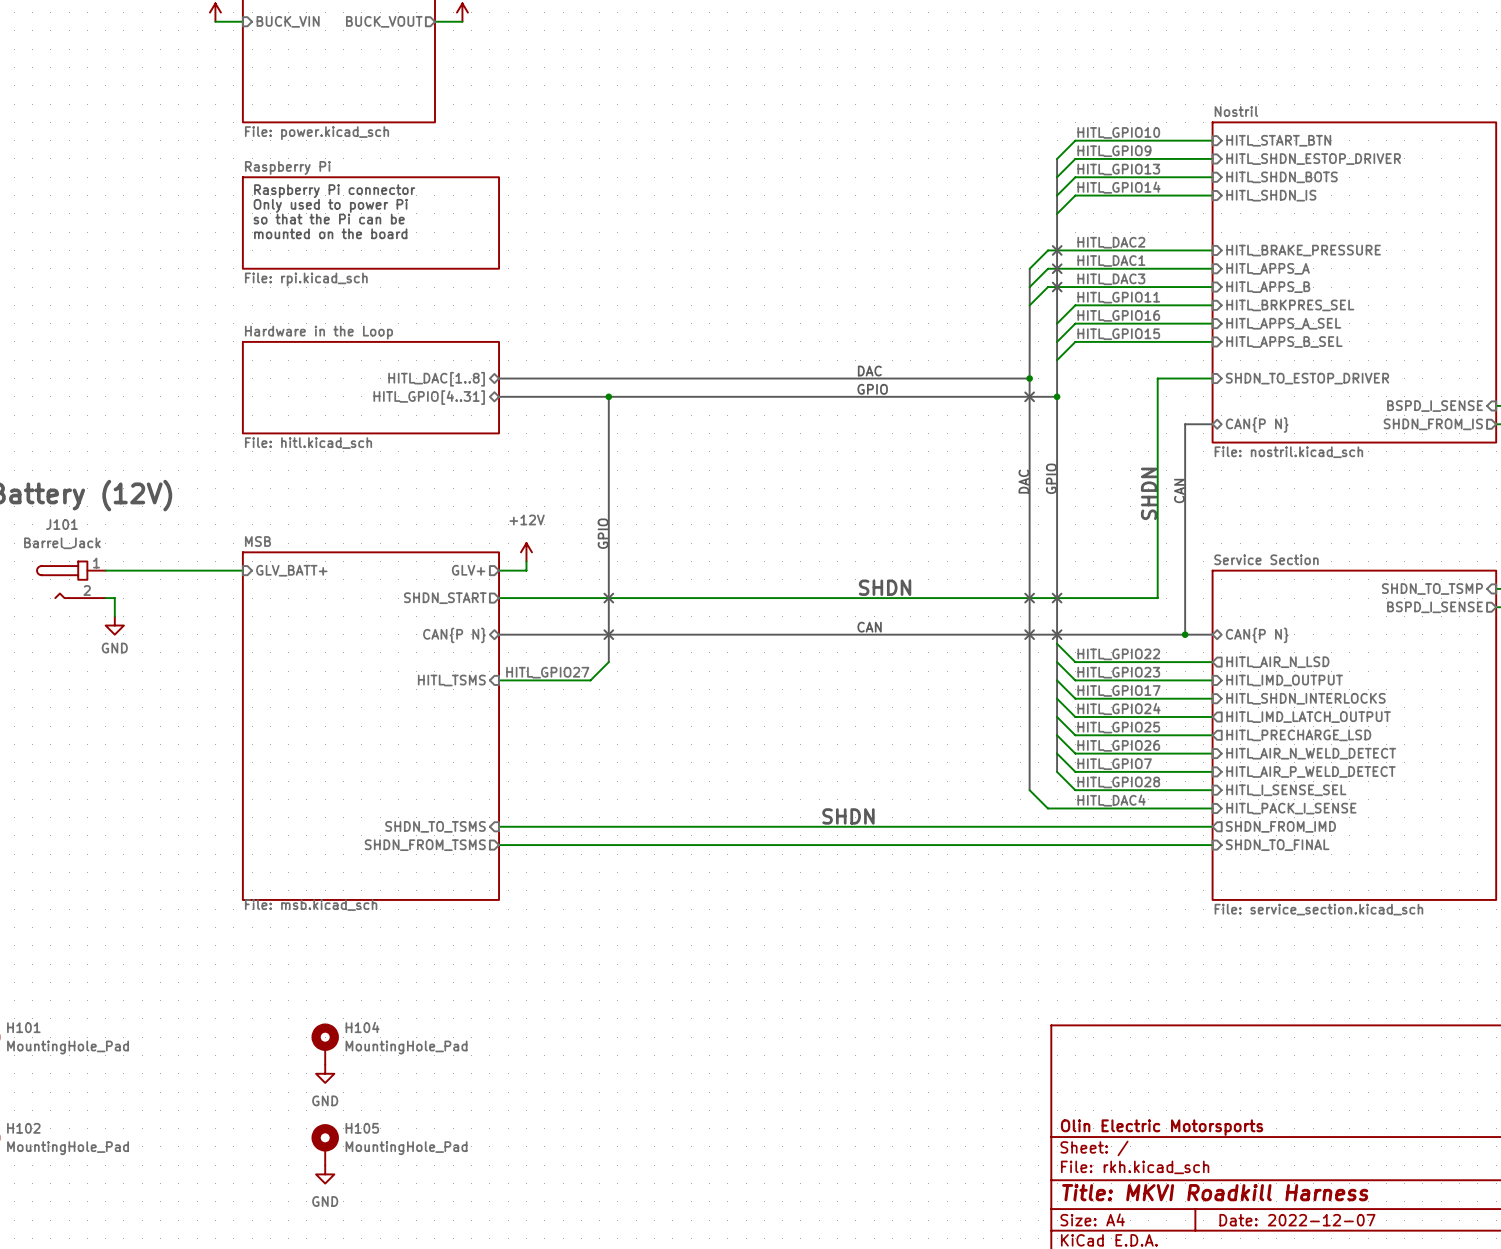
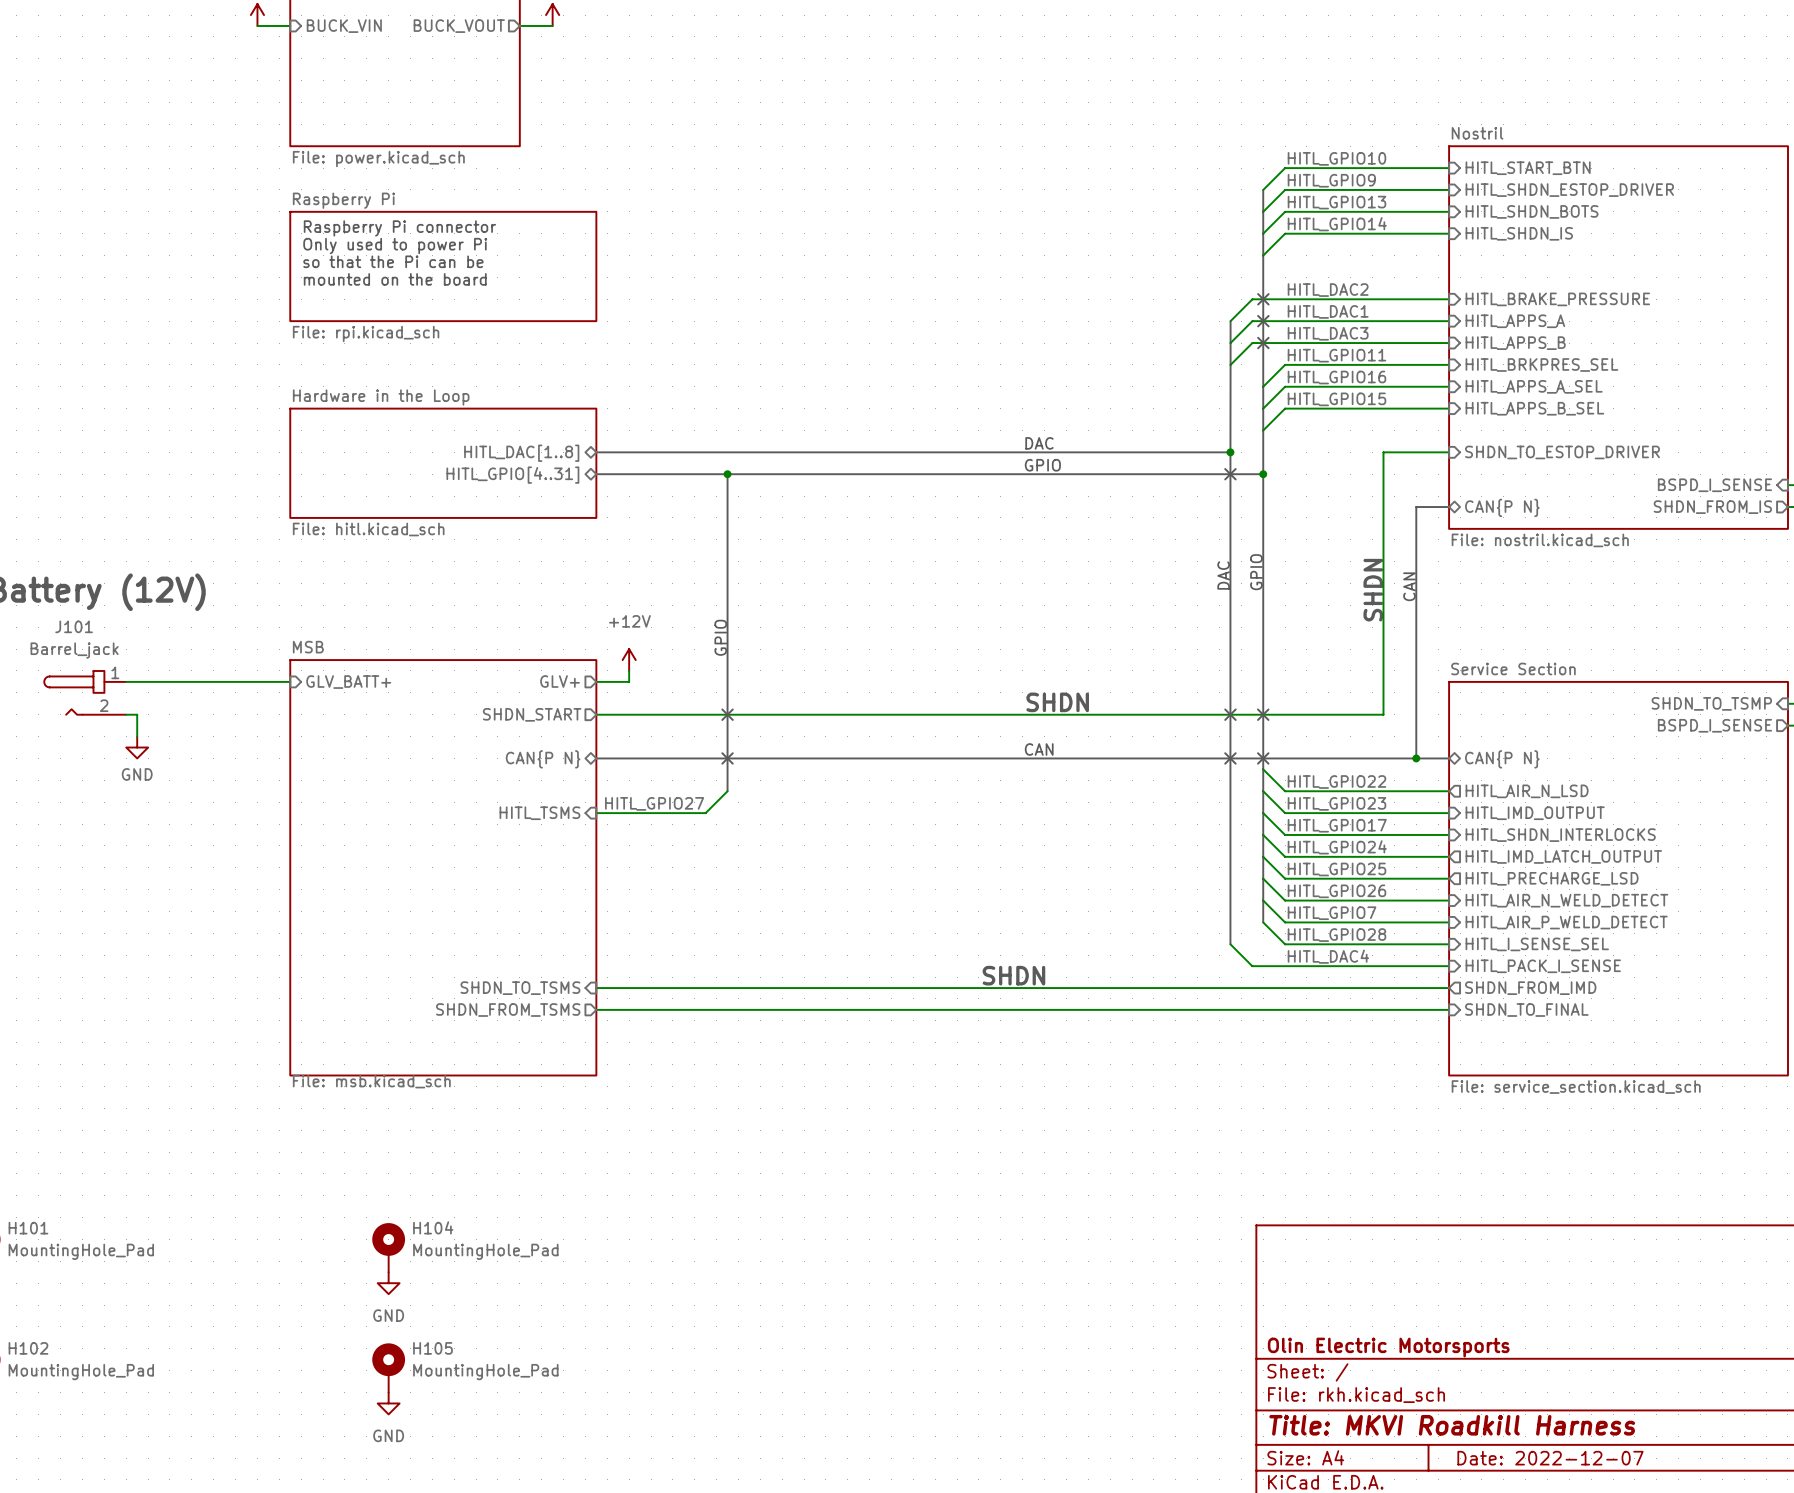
J101 value: Barrel_Jack (62, 543) -> Barrel_jack (74, 650)

